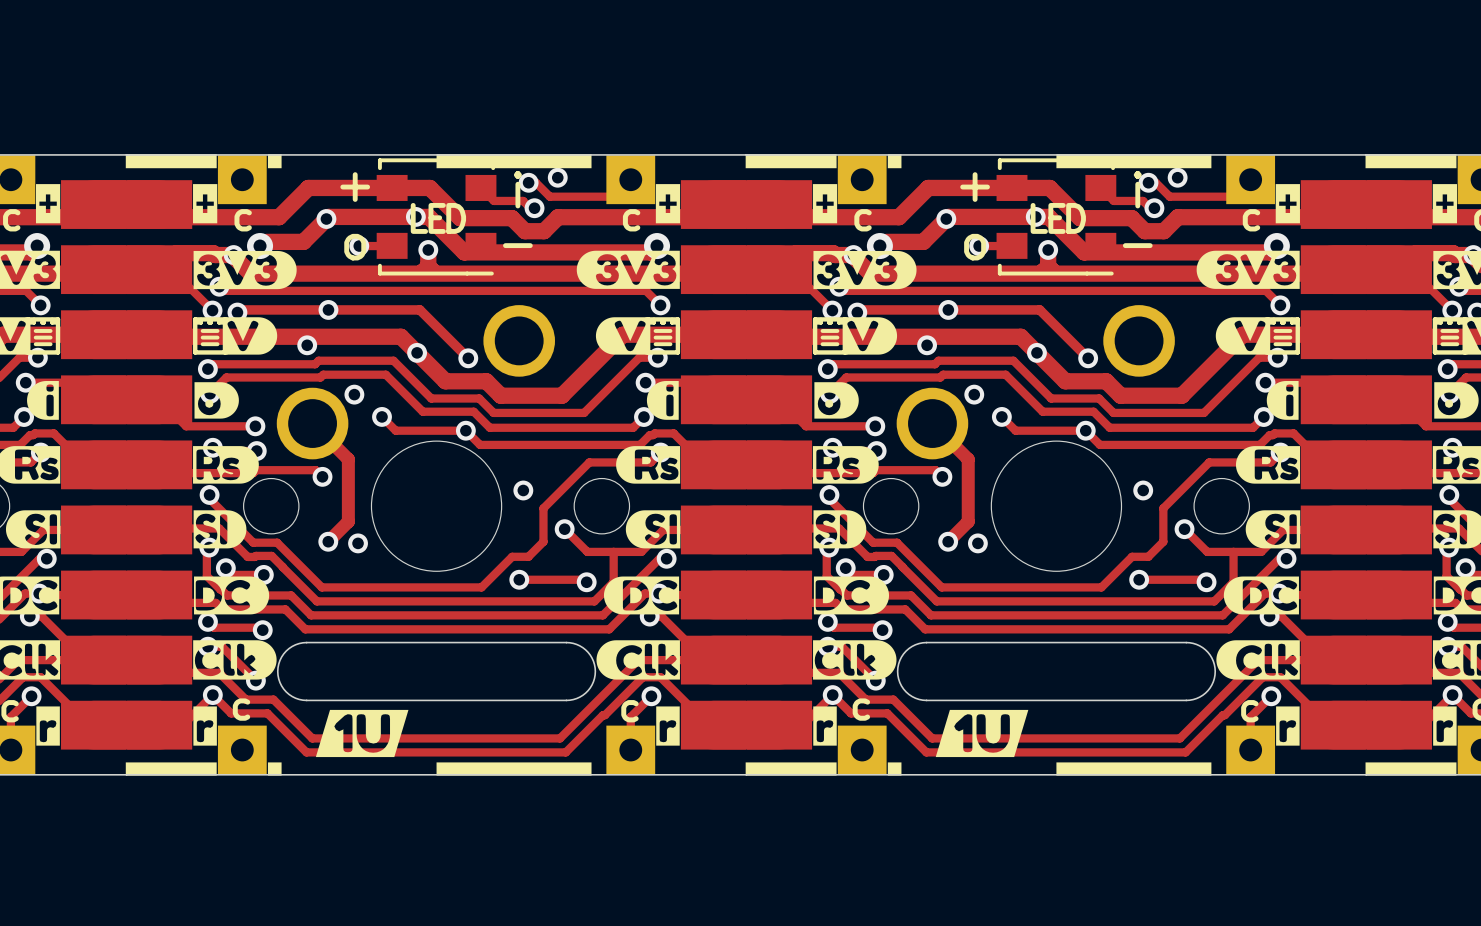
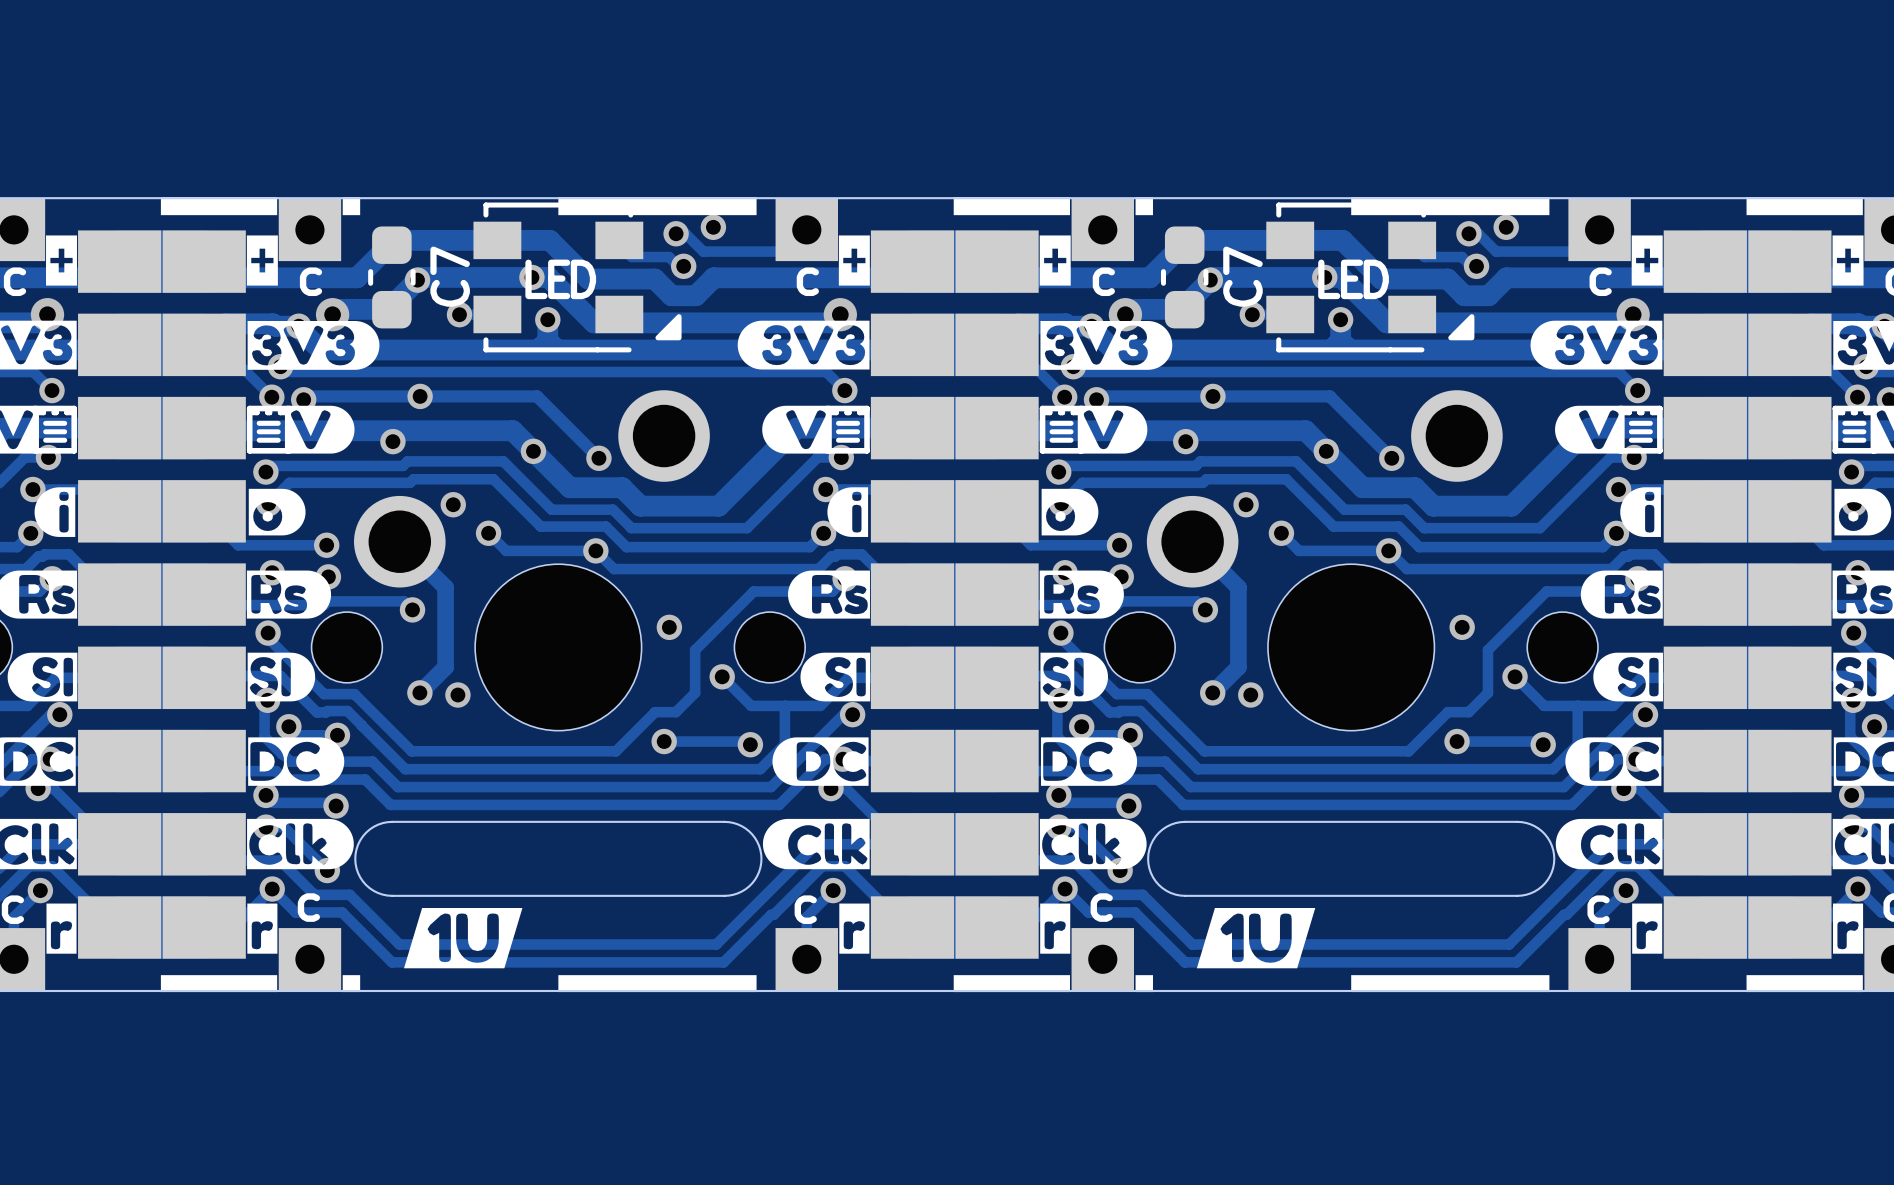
part footprint: [376, 158, 497, 276] -> [473, 202, 682, 353]
part footprint: [996, 158, 1117, 276] -> [1266, 202, 1475, 353]
C7: none -> (391, 277)
C7: none -> (1184, 277)

